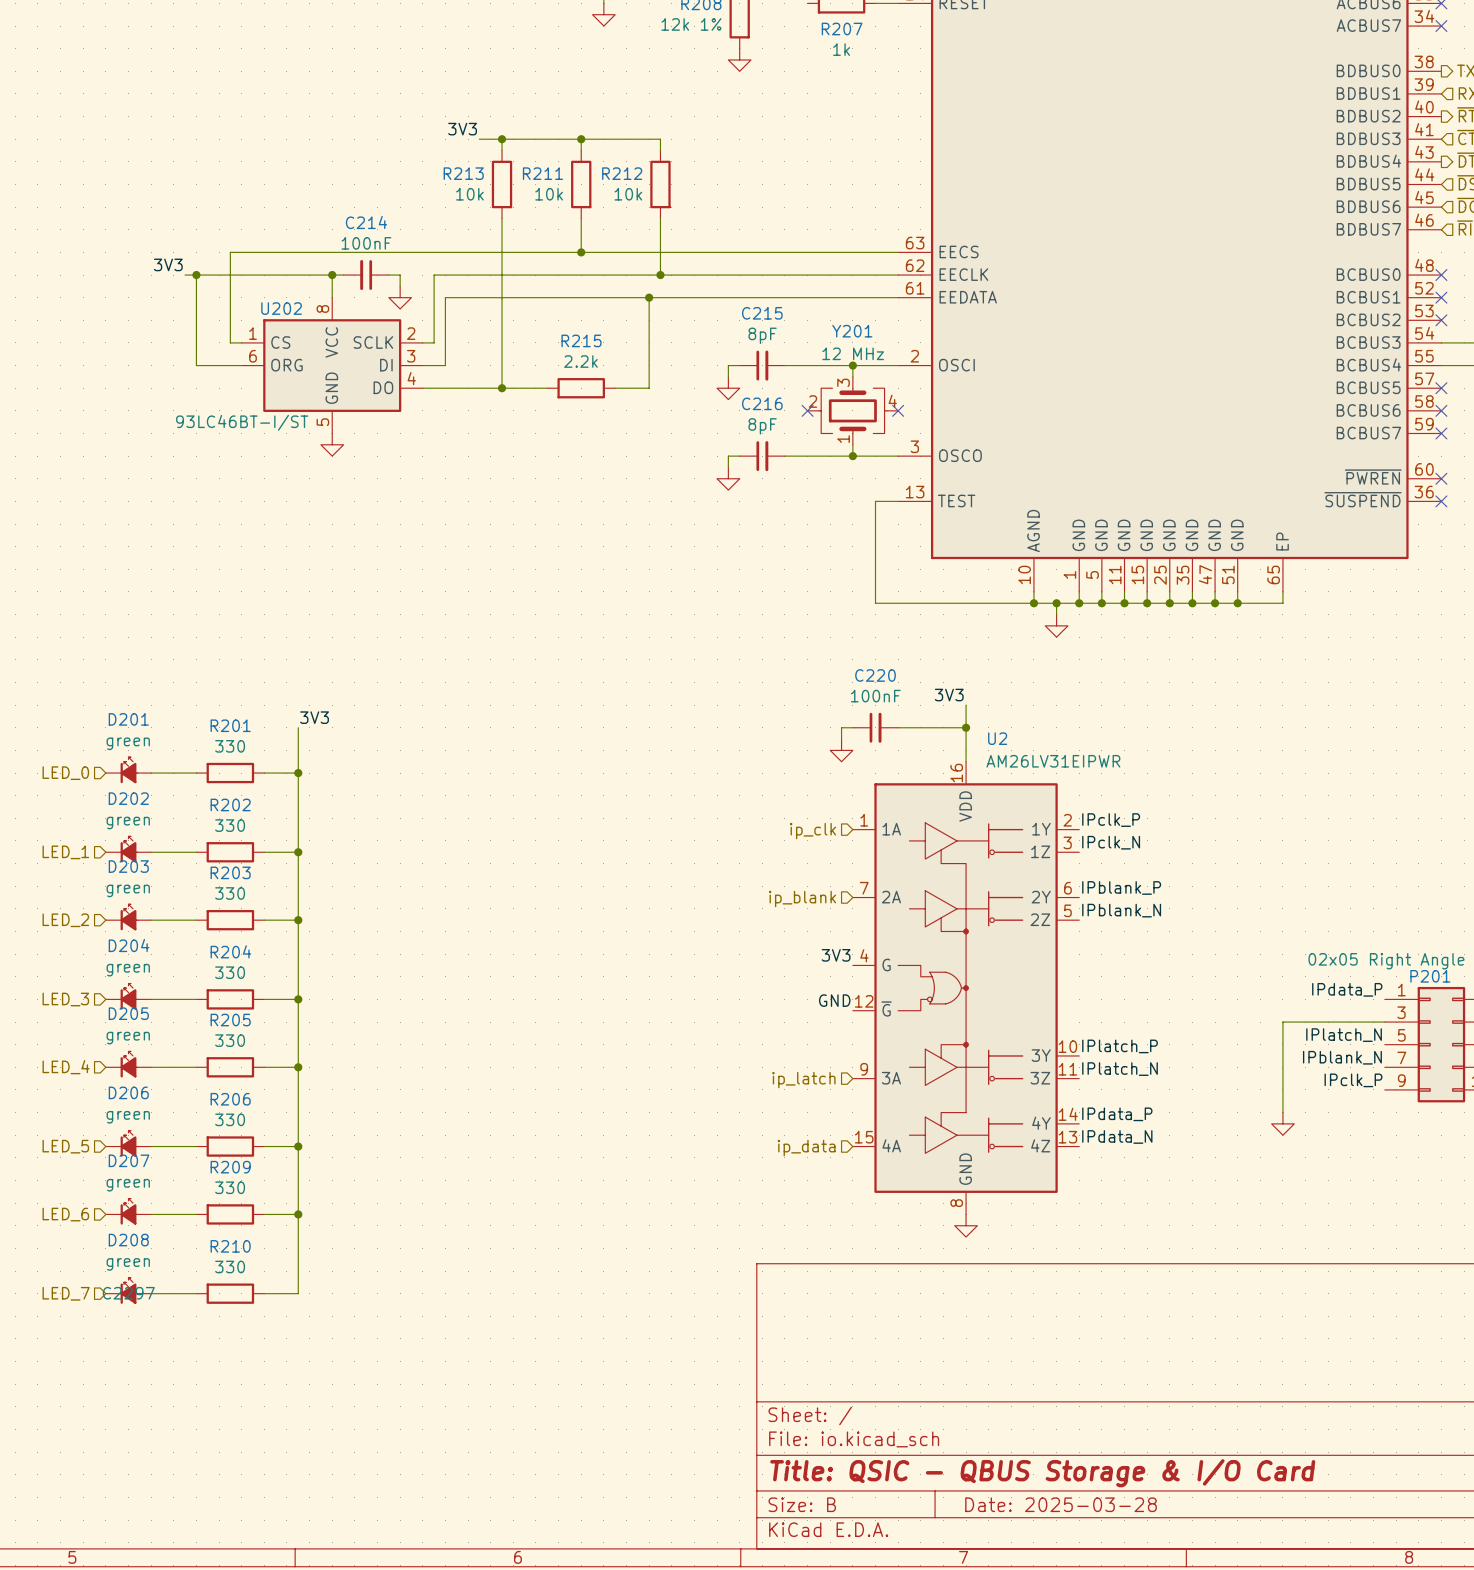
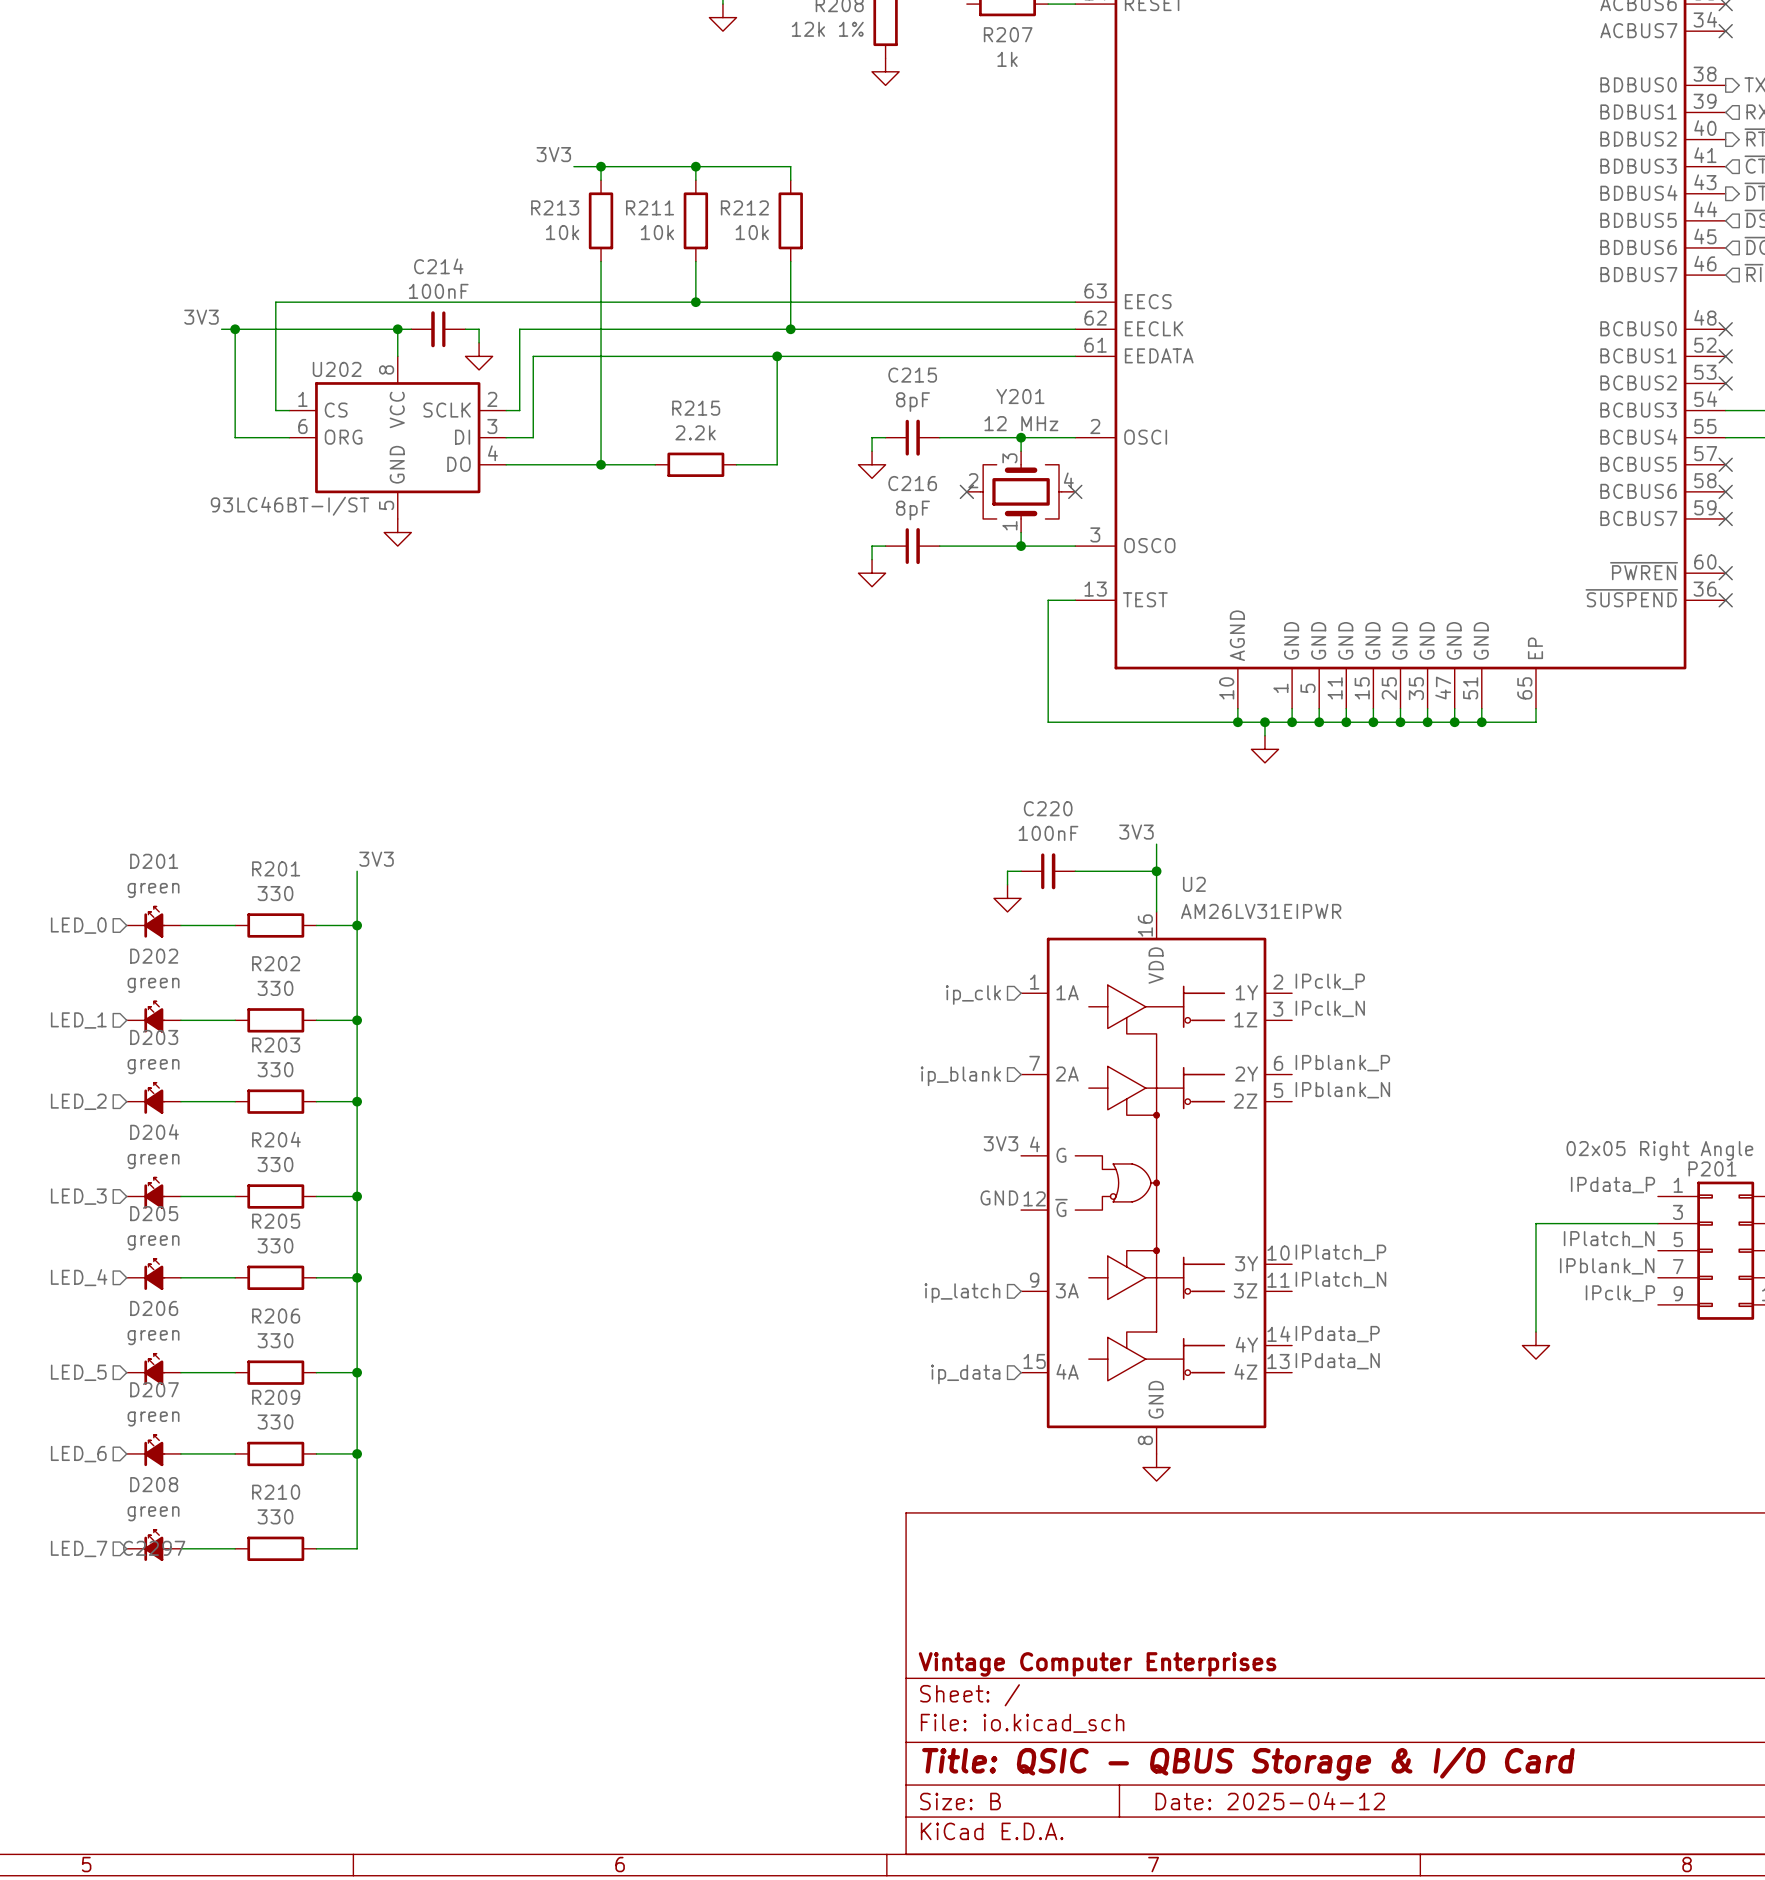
title block: none -> Vintage Computer Enterprises (1097, 1664)
title block: Date: 2025-03-28 (1061, 1504) -> Date: 2025-04-12 (1270, 1801)

